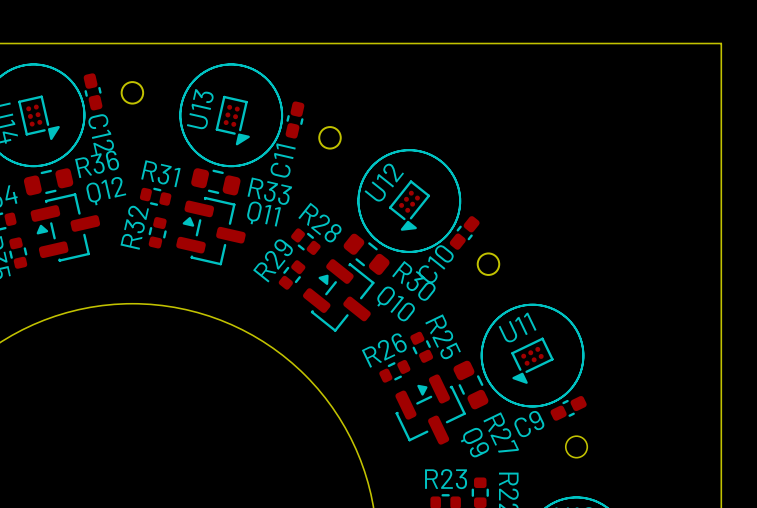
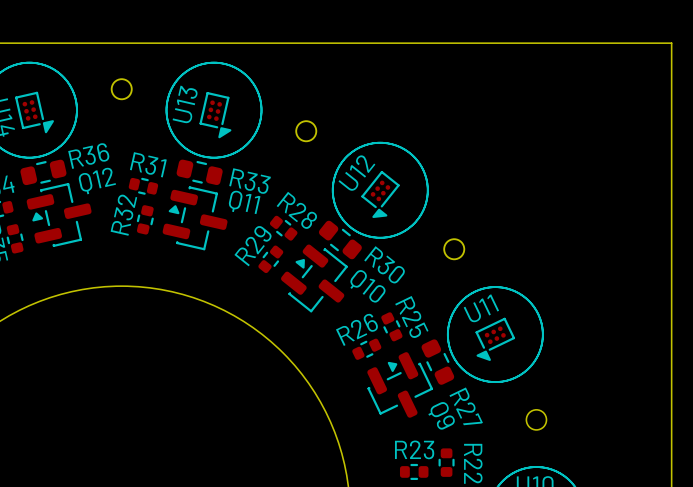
C12: (93, 91) -> none
C11: (294, 120) -> none
C10: (464, 232) -> none
C9: (568, 408) -> none

